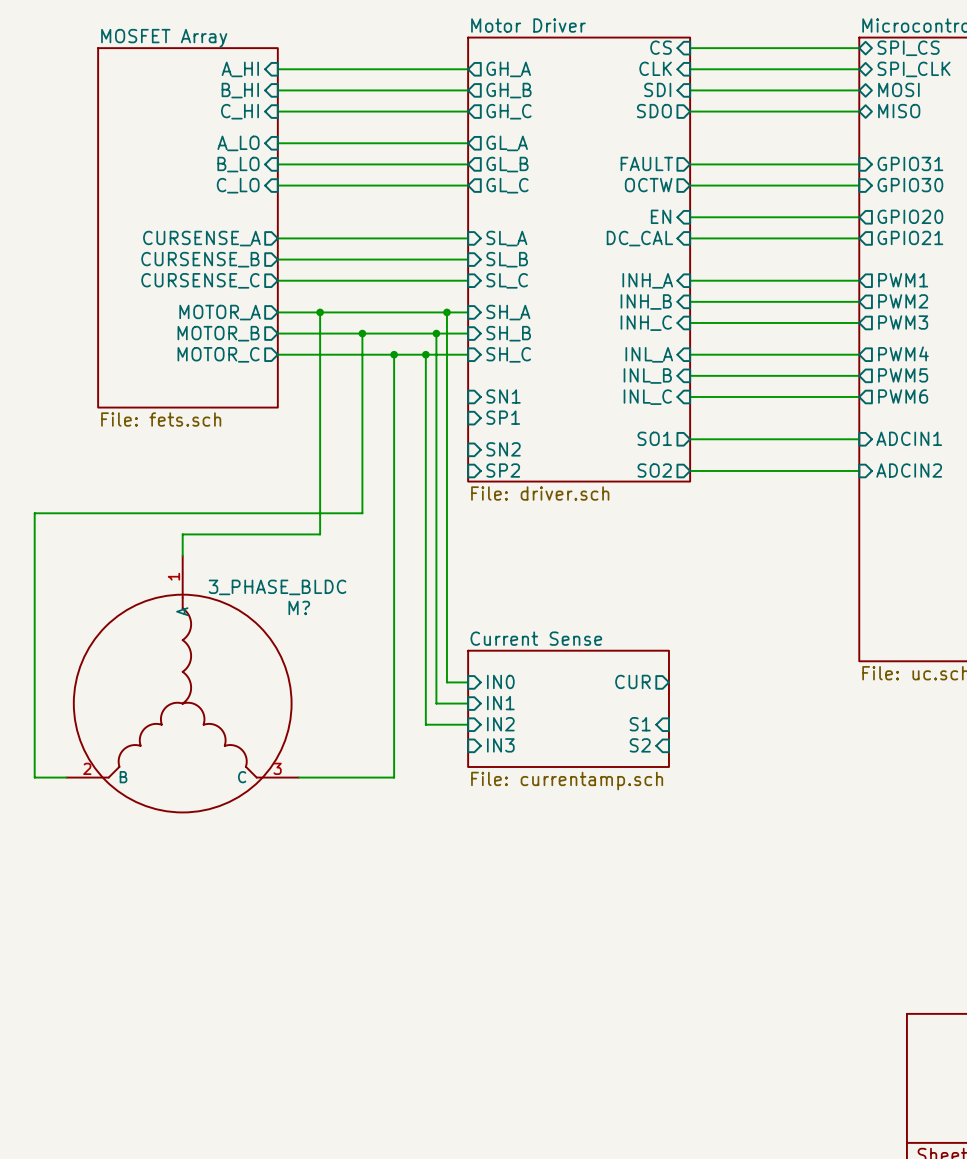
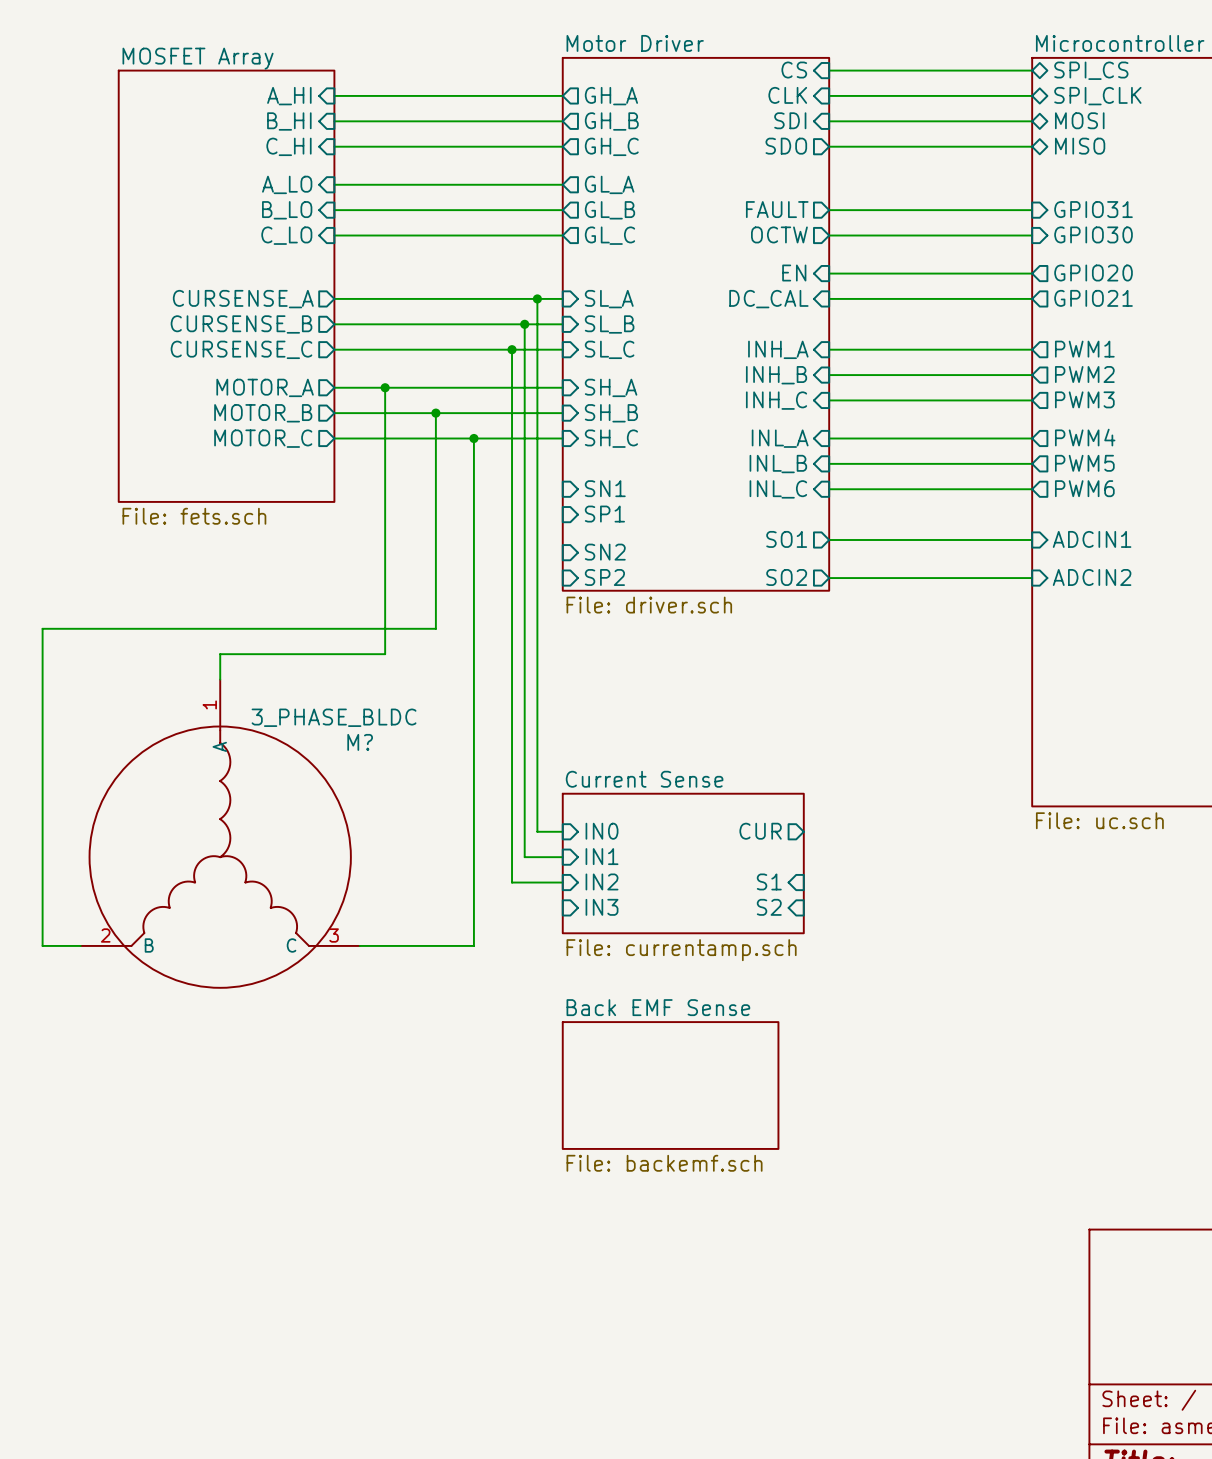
wire: none -> (537, 298) (537, 387)
junction: none -> (537, 298)
wire: none -> (524, 324) (524, 413)
junction: none -> (524, 324)
wire: none -> (512, 349) (512, 438)
junction: none -> (512, 349)
junction: (446, 312) -> none
junction: (436, 333) -> none
junction: (425, 354) -> none
sheet Back EMF Sense: none -> File: backemf.sch (670, 1085)

